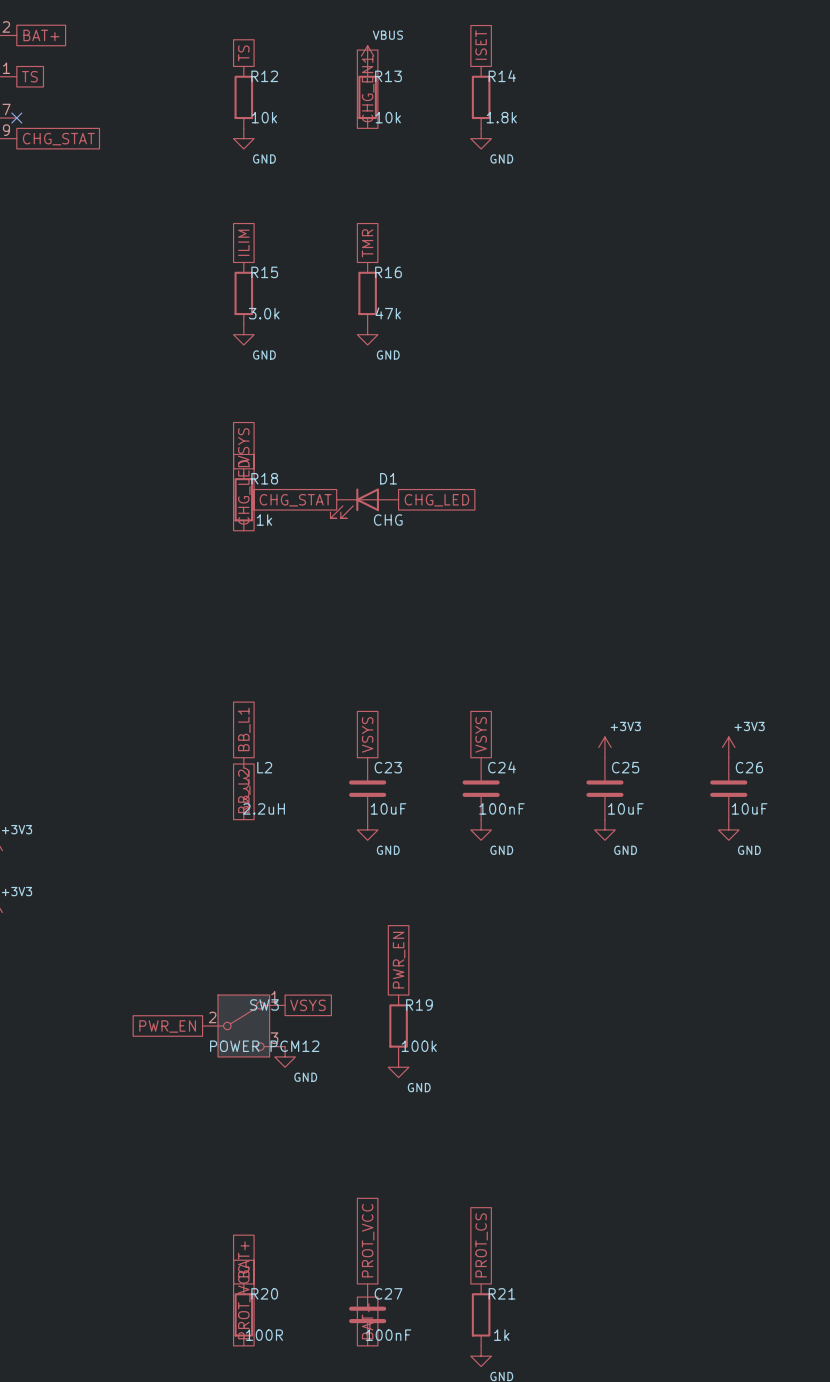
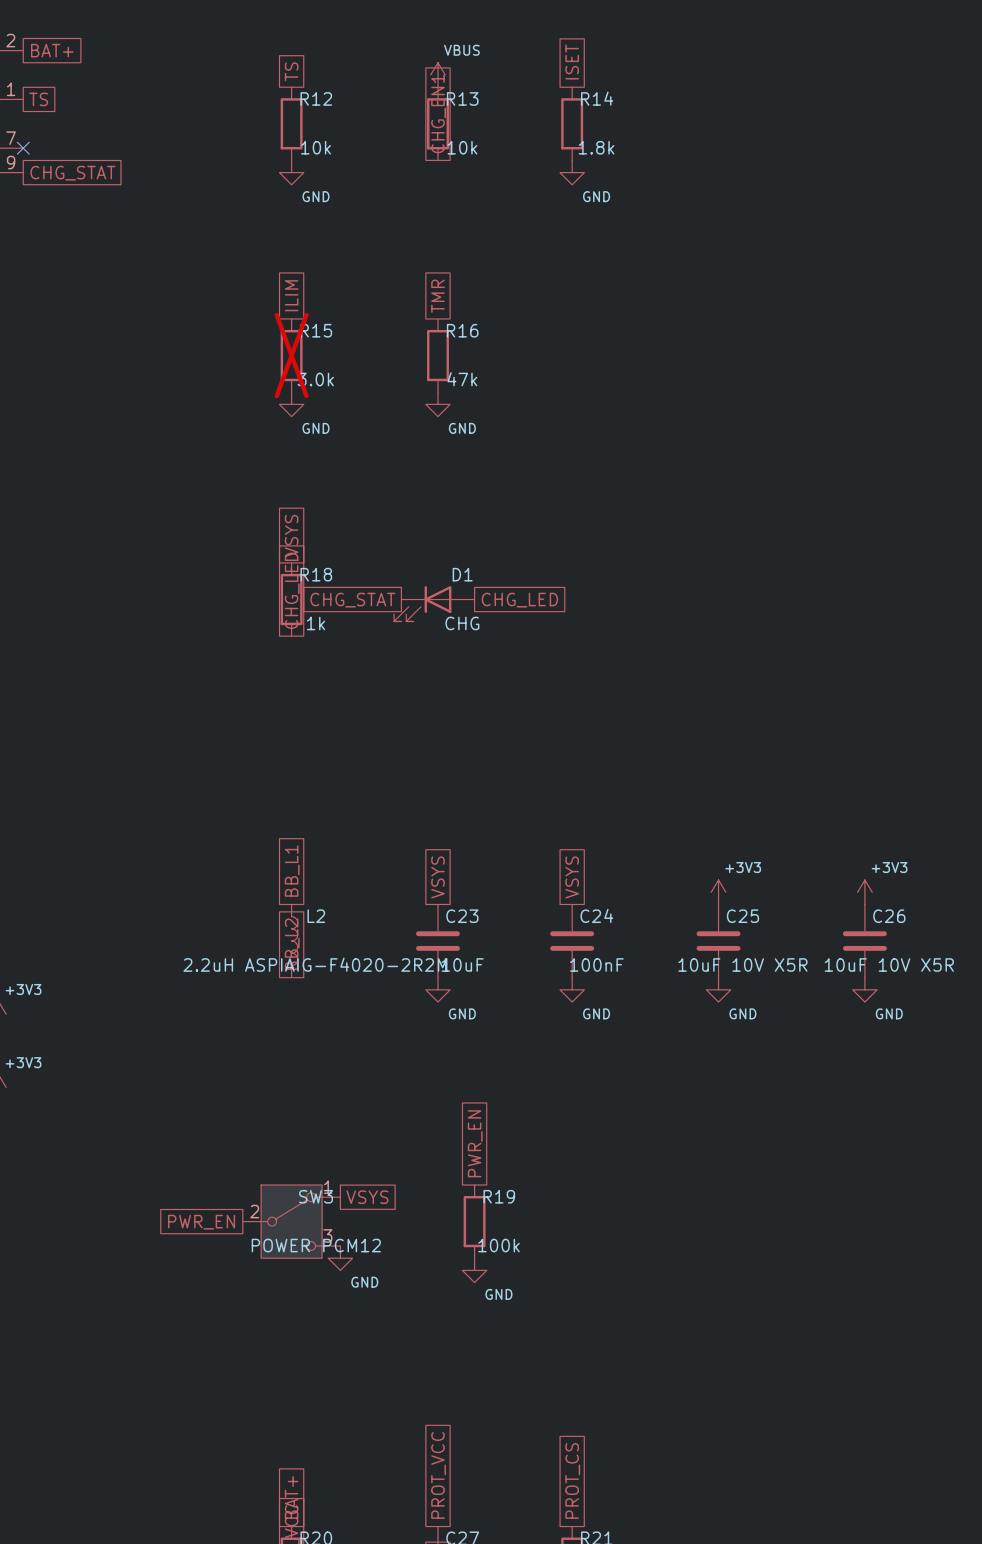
R15 do-not-place cross: none -> (291, 355)
L2 value: 2.2uH (263, 808) -> 2.2uH ASPIAIG-F4020-2R2M (315, 964)
C25 value: 10uF (625, 808) -> 10uF 10V X5R (742, 964)
C26 value: 10uF (749, 808) -> 10uF 10V X5R (889, 964)

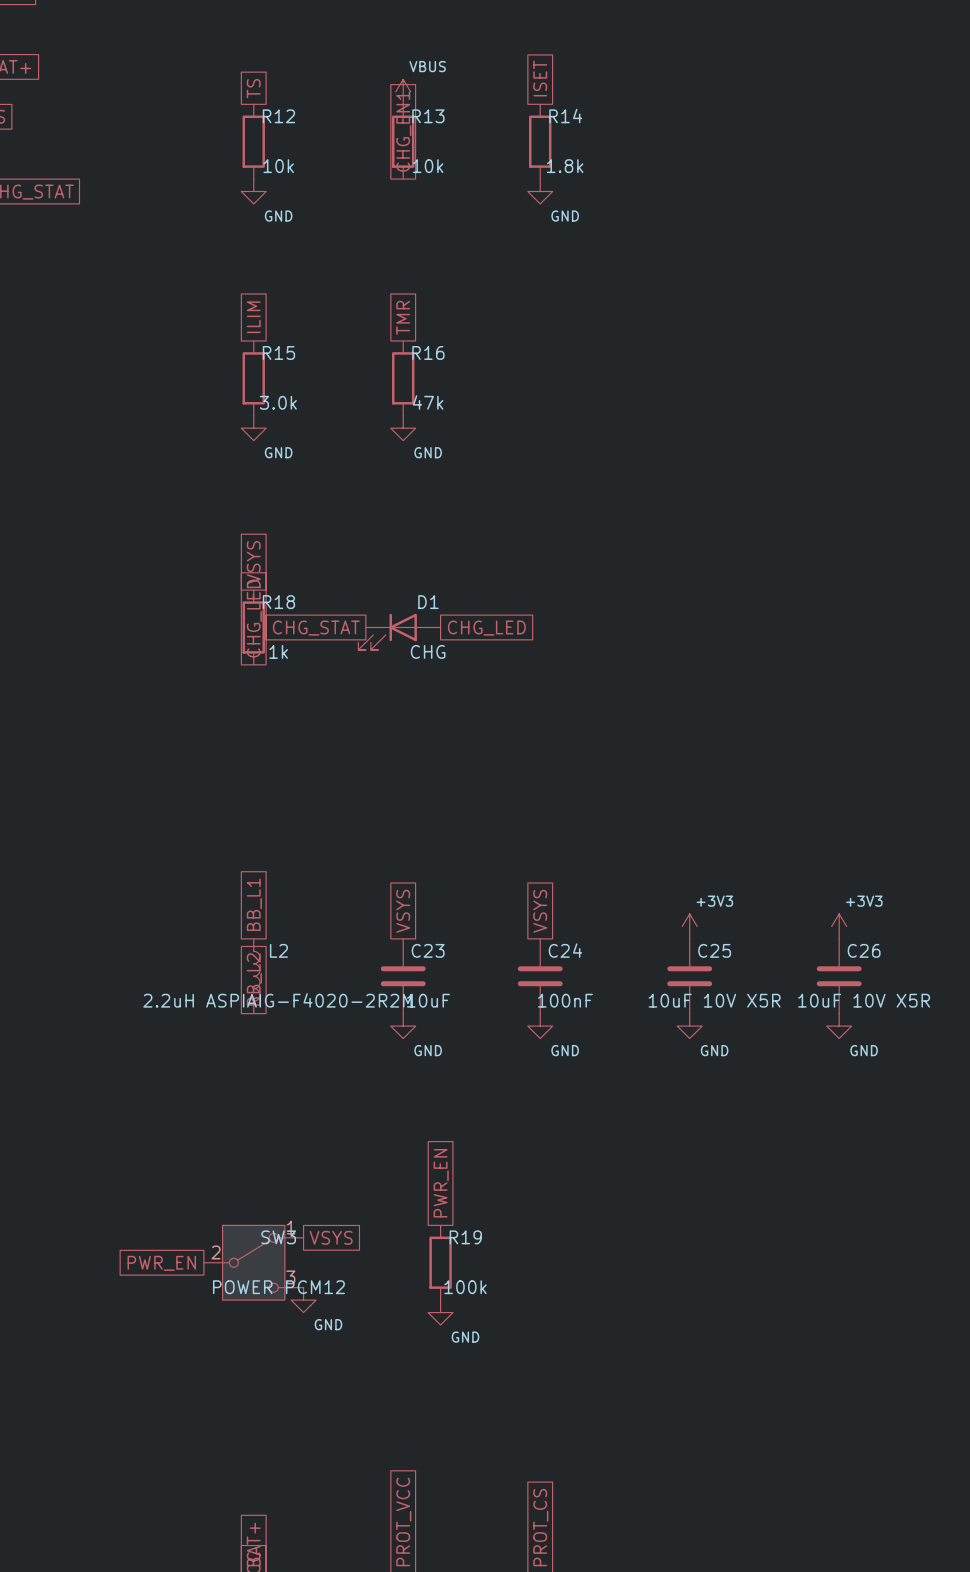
R15 do-not-place cross: (291, 355) -> none

